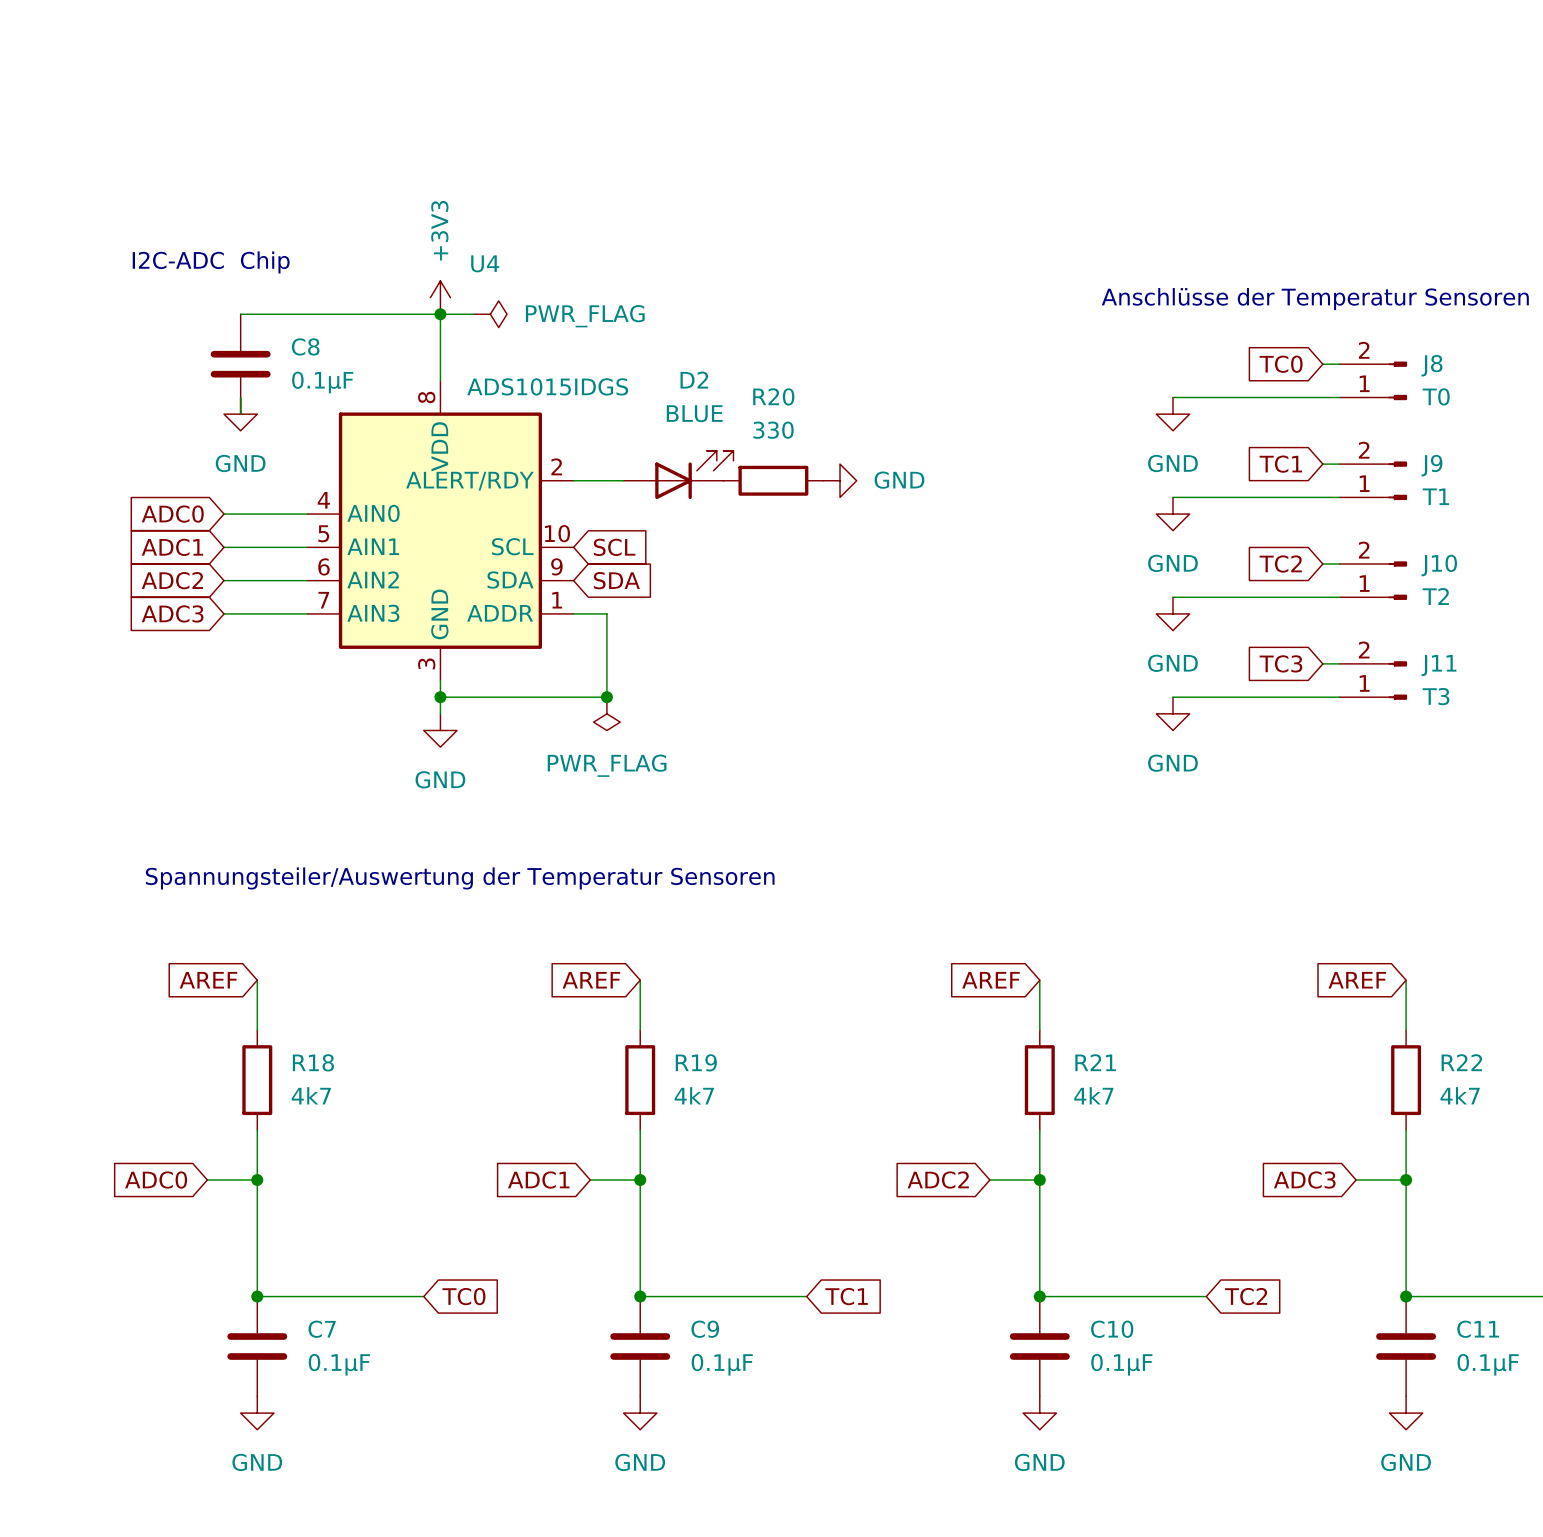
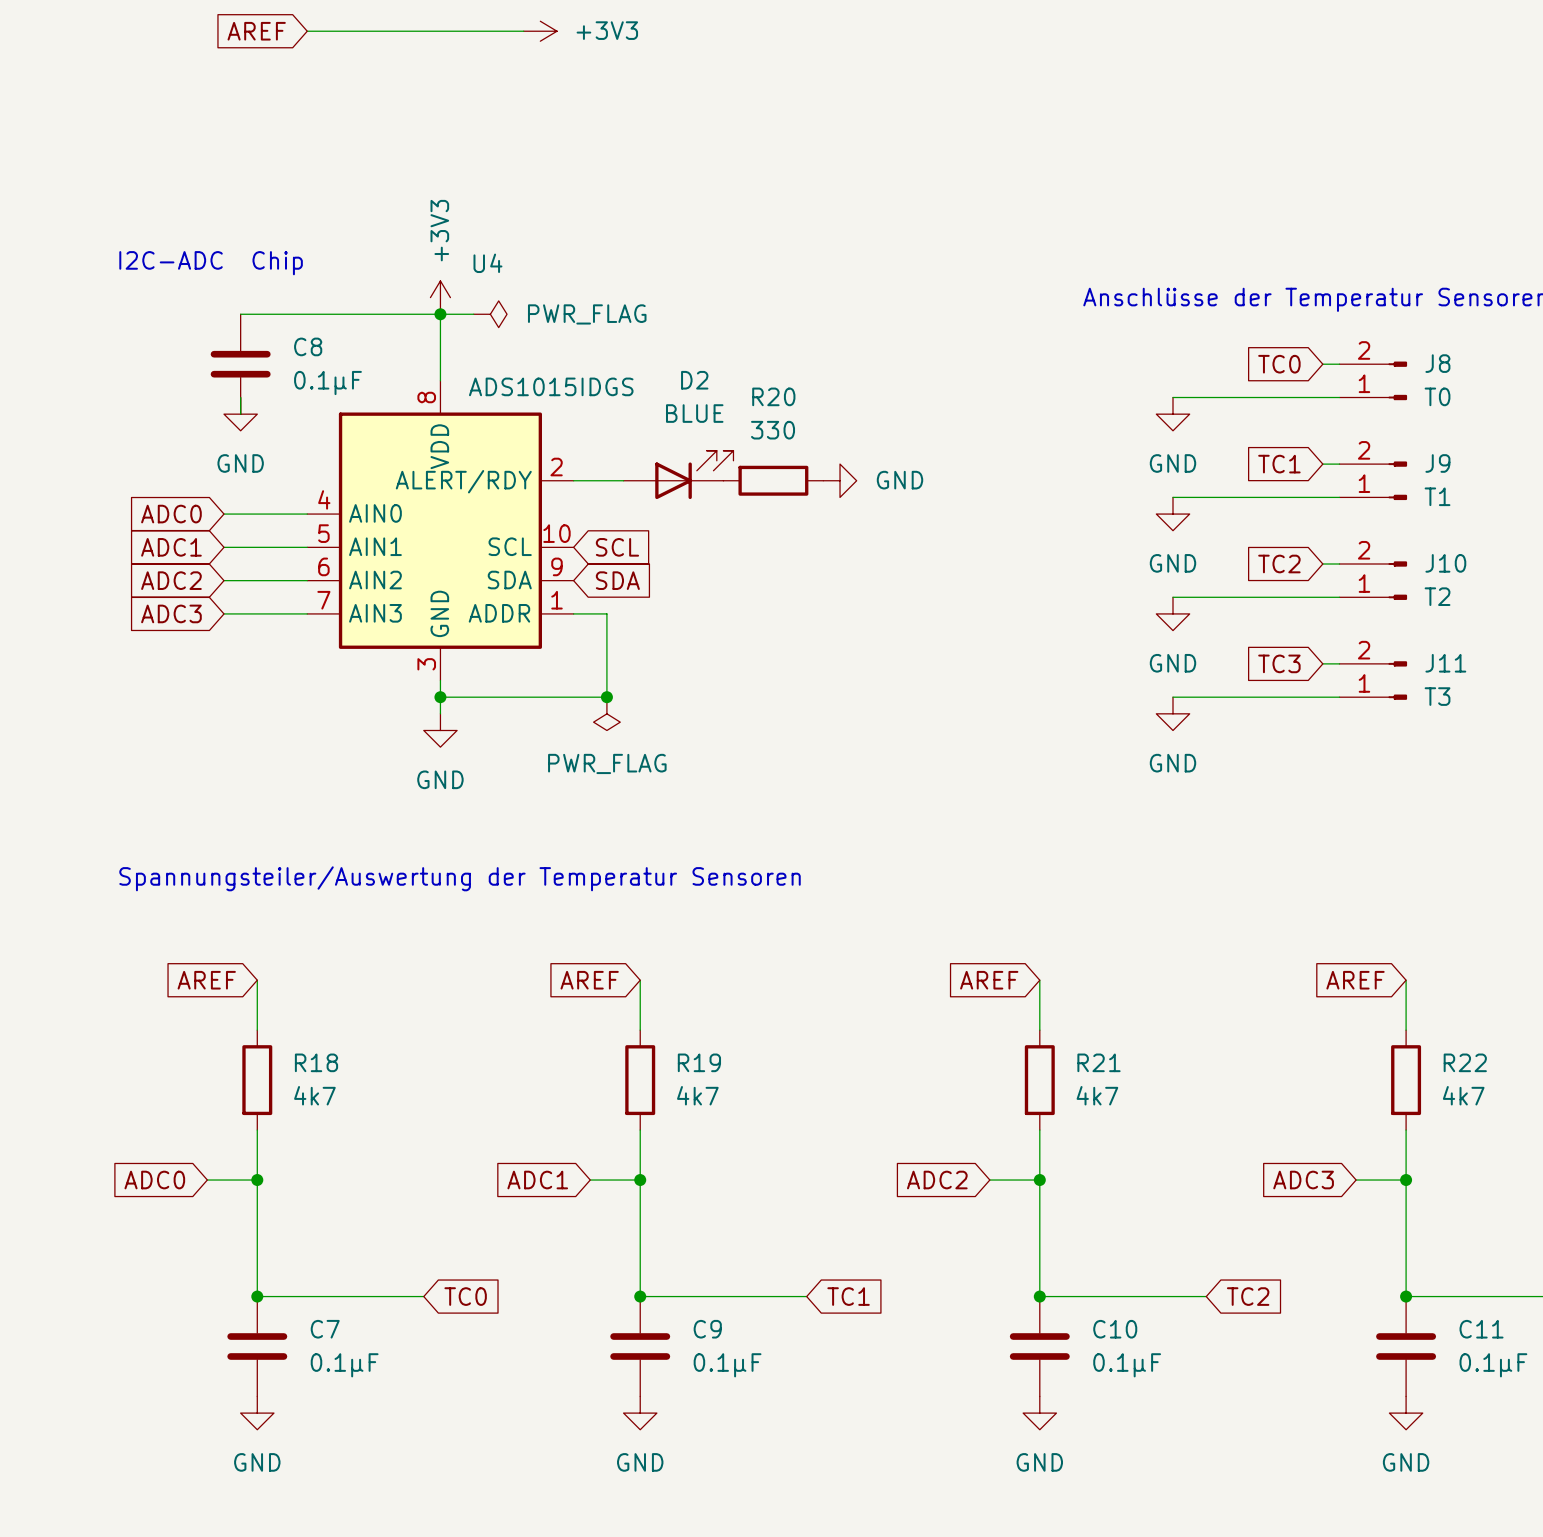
global label: none -> AREF (256, 31)
wire: none -> (307, 31) (523, 31)
power symbol: none -> +3V3 (540, 31)

